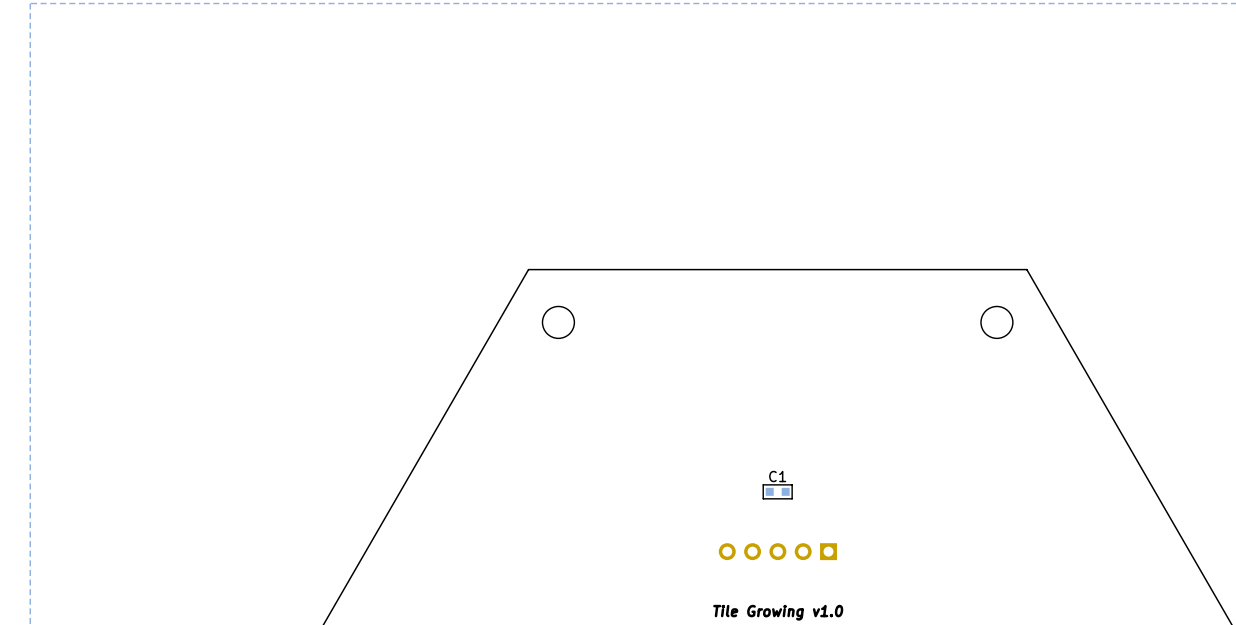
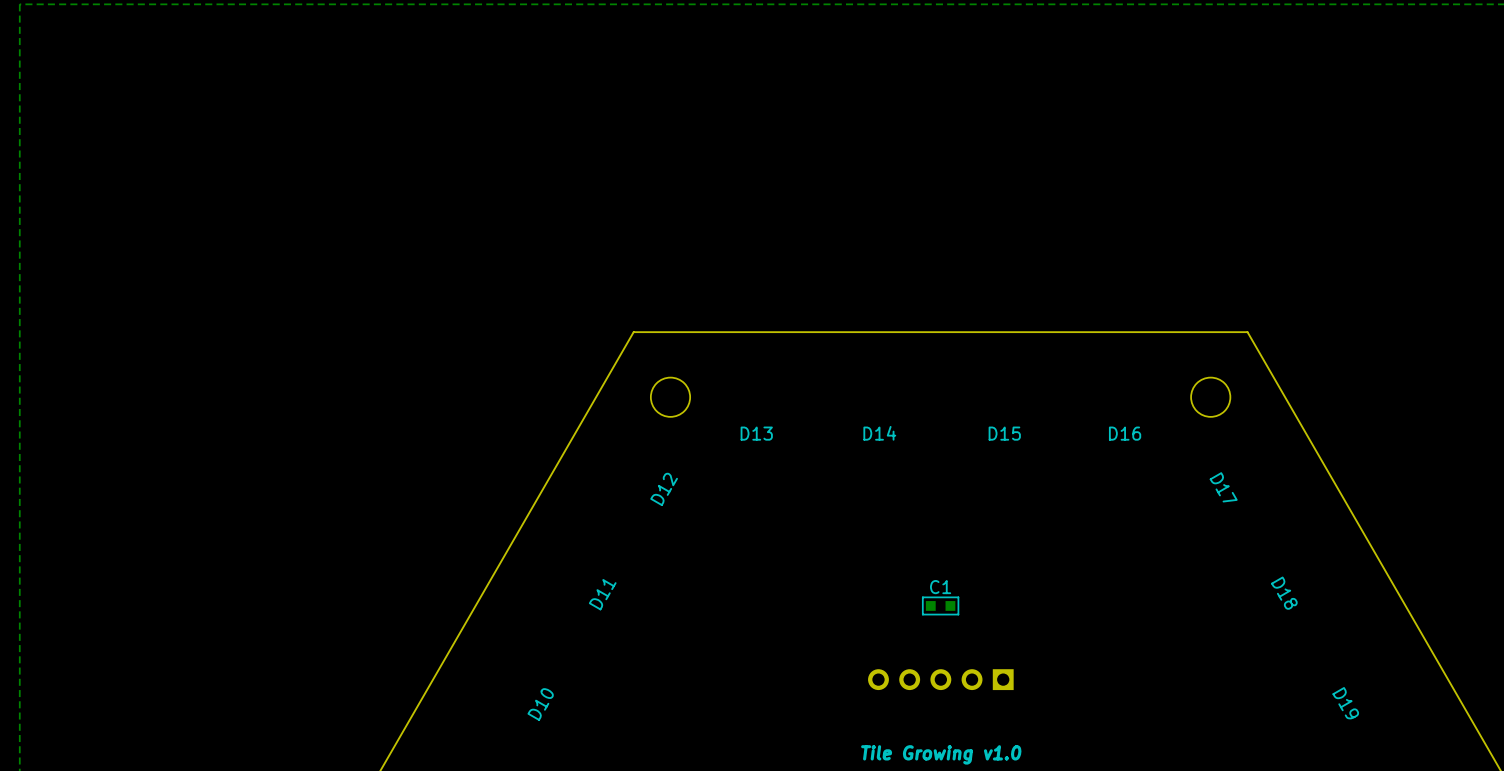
D13: none -> (756, 433)
D14: none -> (879, 433)
D15: none -> (1004, 433)
D16: none -> (1125, 433)
D17: none -> (1223, 487)
D12: none -> (664, 489)
D18: none -> (1284, 593)
D11: none -> (602, 594)
D19: none -> (1345, 703)
D10: none -> (540, 704)

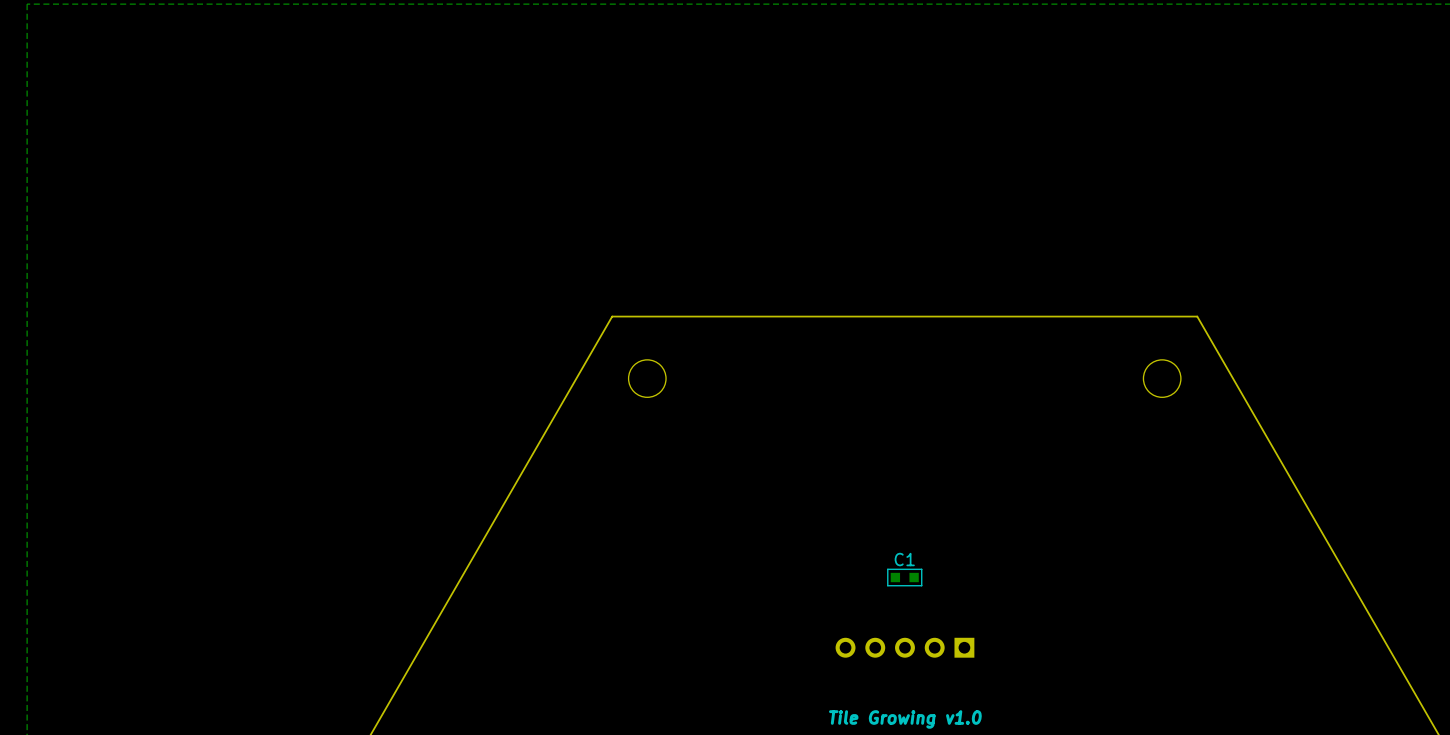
D13: (756, 433) -> none
D14: (879, 433) -> none
D15: (1004, 433) -> none
D16: (1125, 433) -> none
D17: (1223, 487) -> none
D12: (664, 489) -> none
D18: (1284, 593) -> none
D11: (602, 594) -> none
D19: (1345, 703) -> none
D10: (540, 704) -> none

